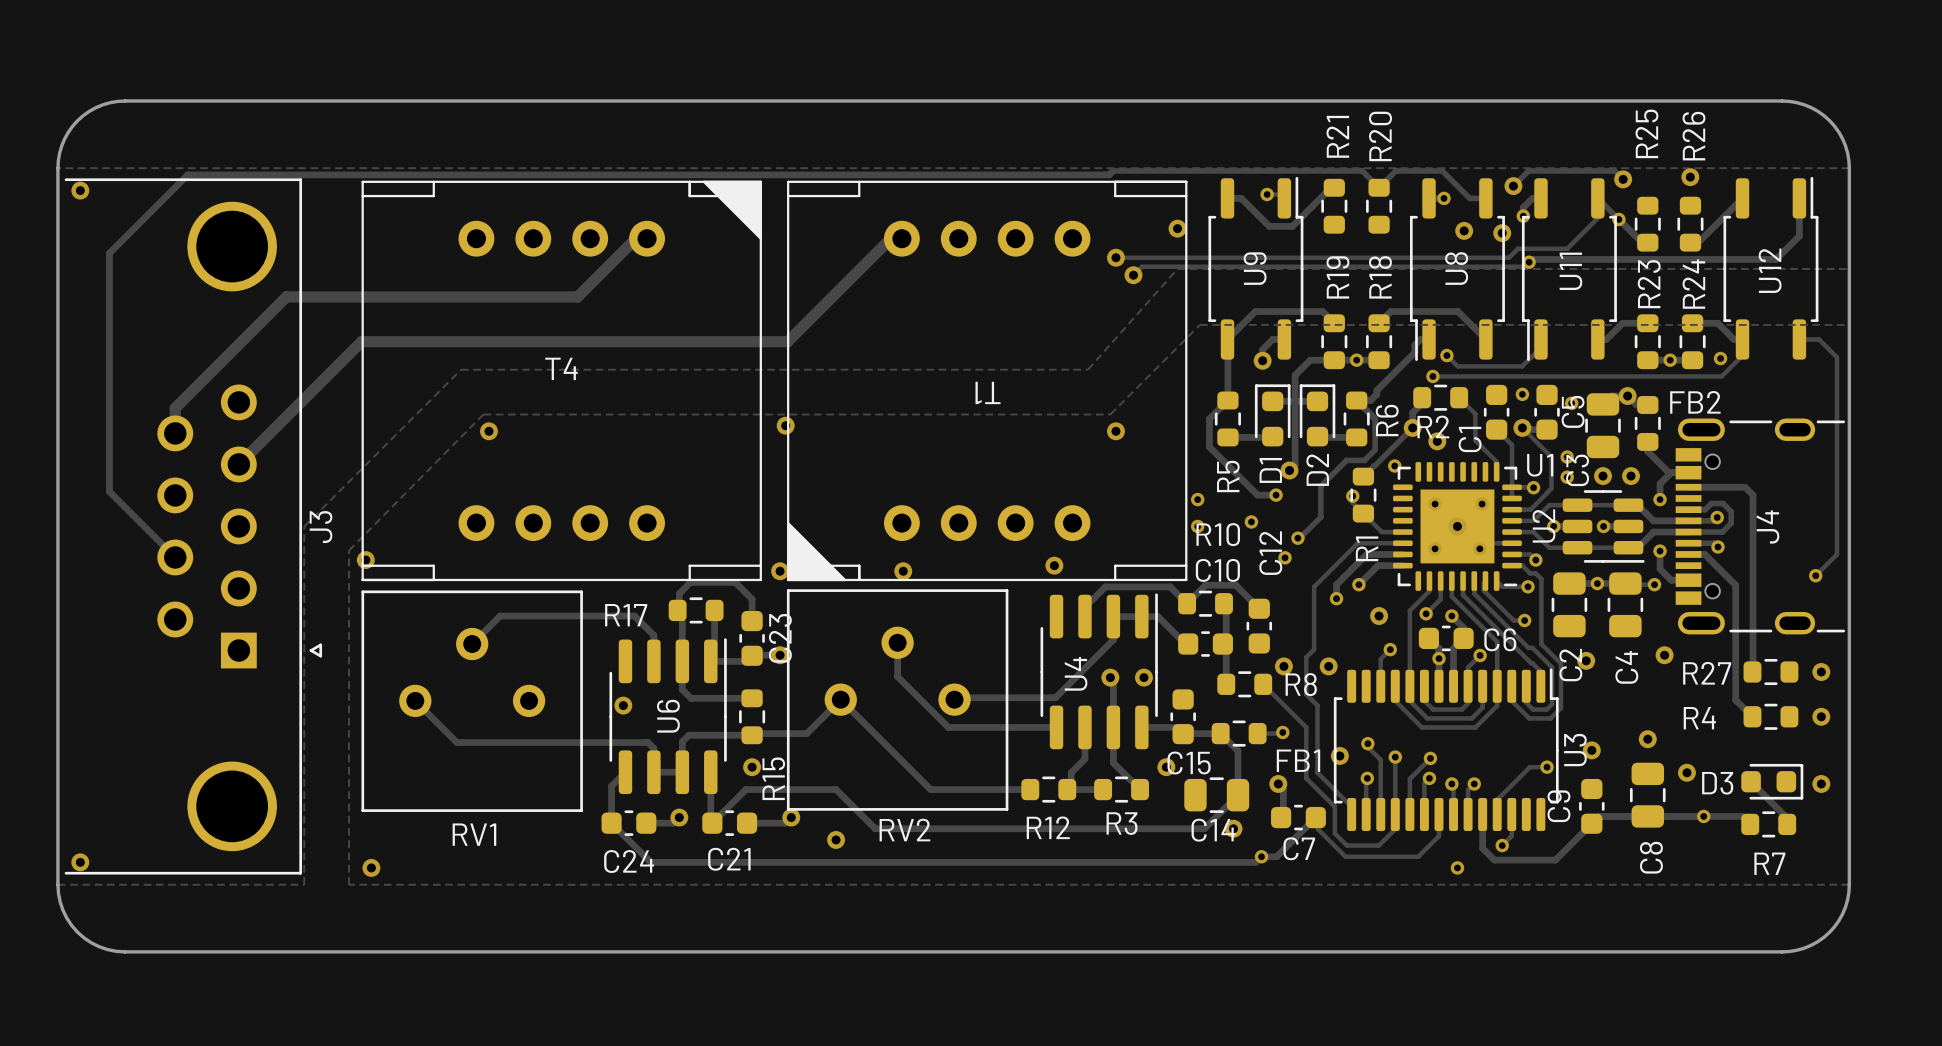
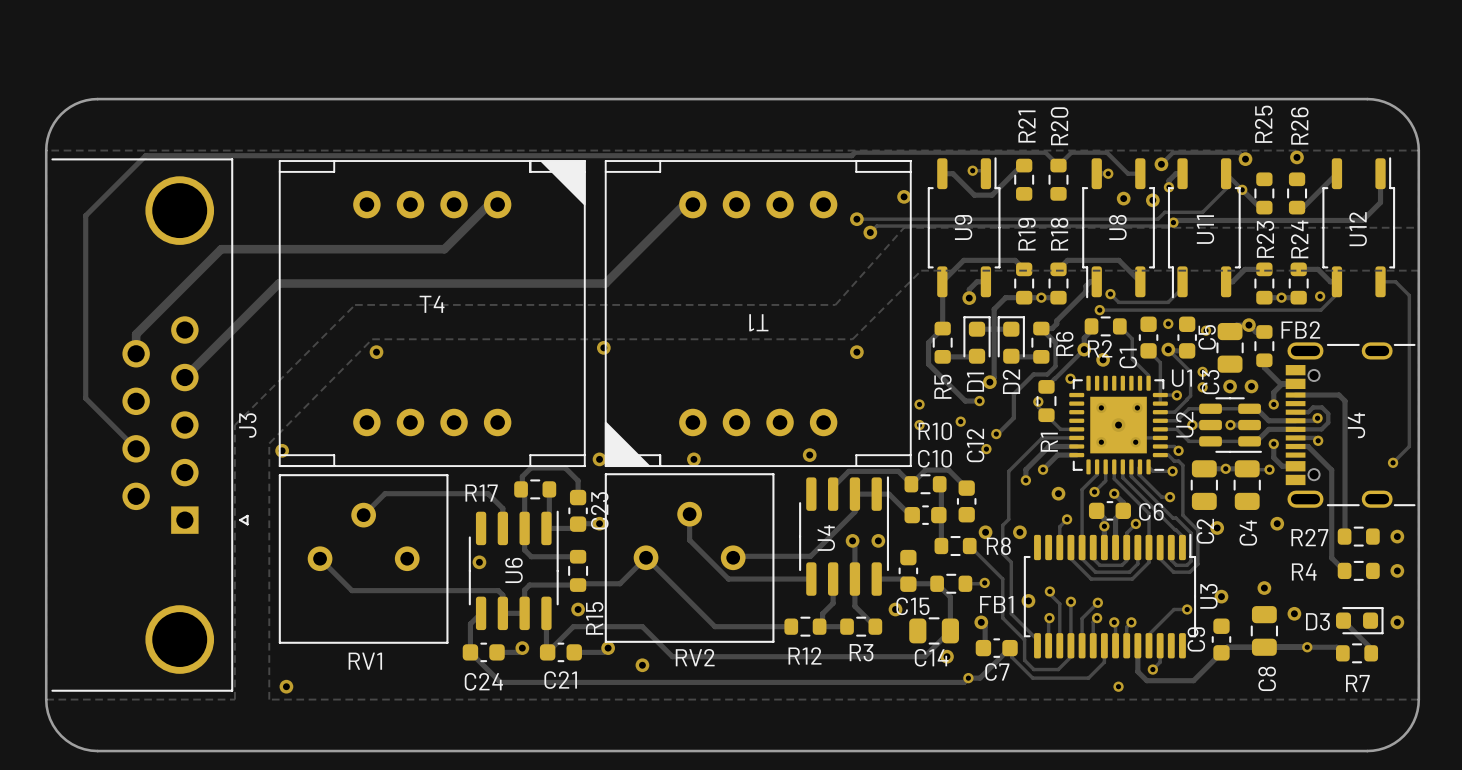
via: (80, 190) -> none
via: (80, 862) -> none

